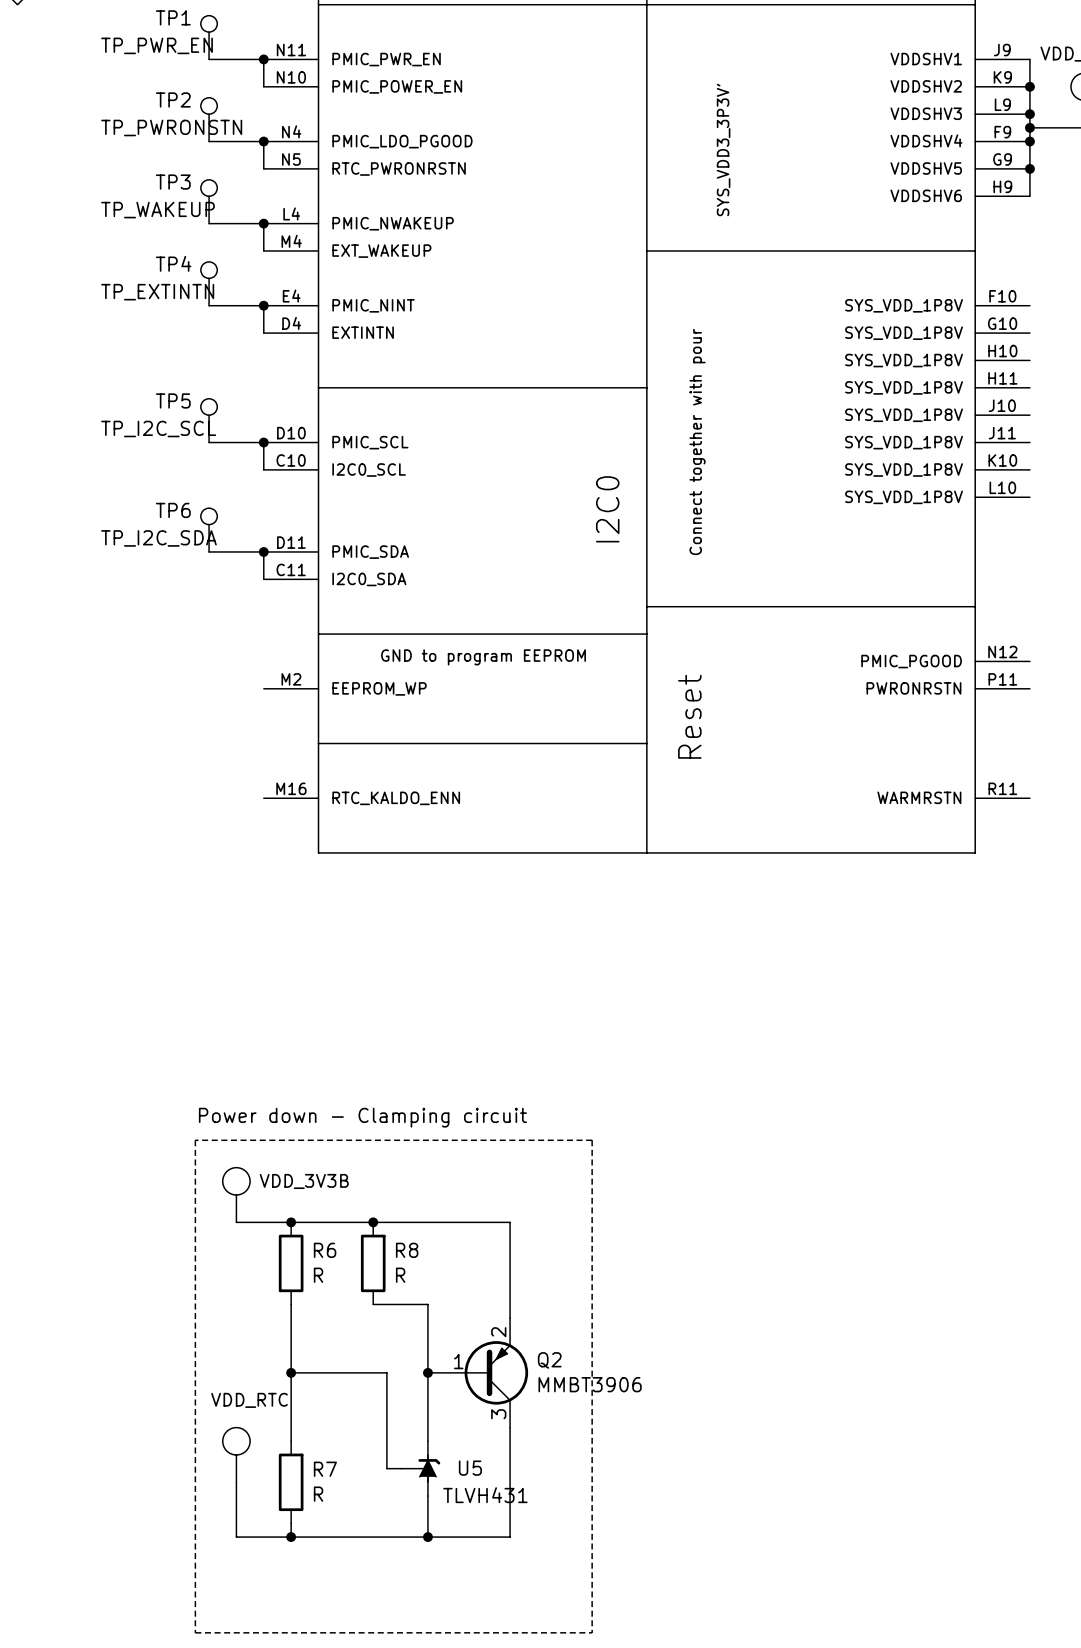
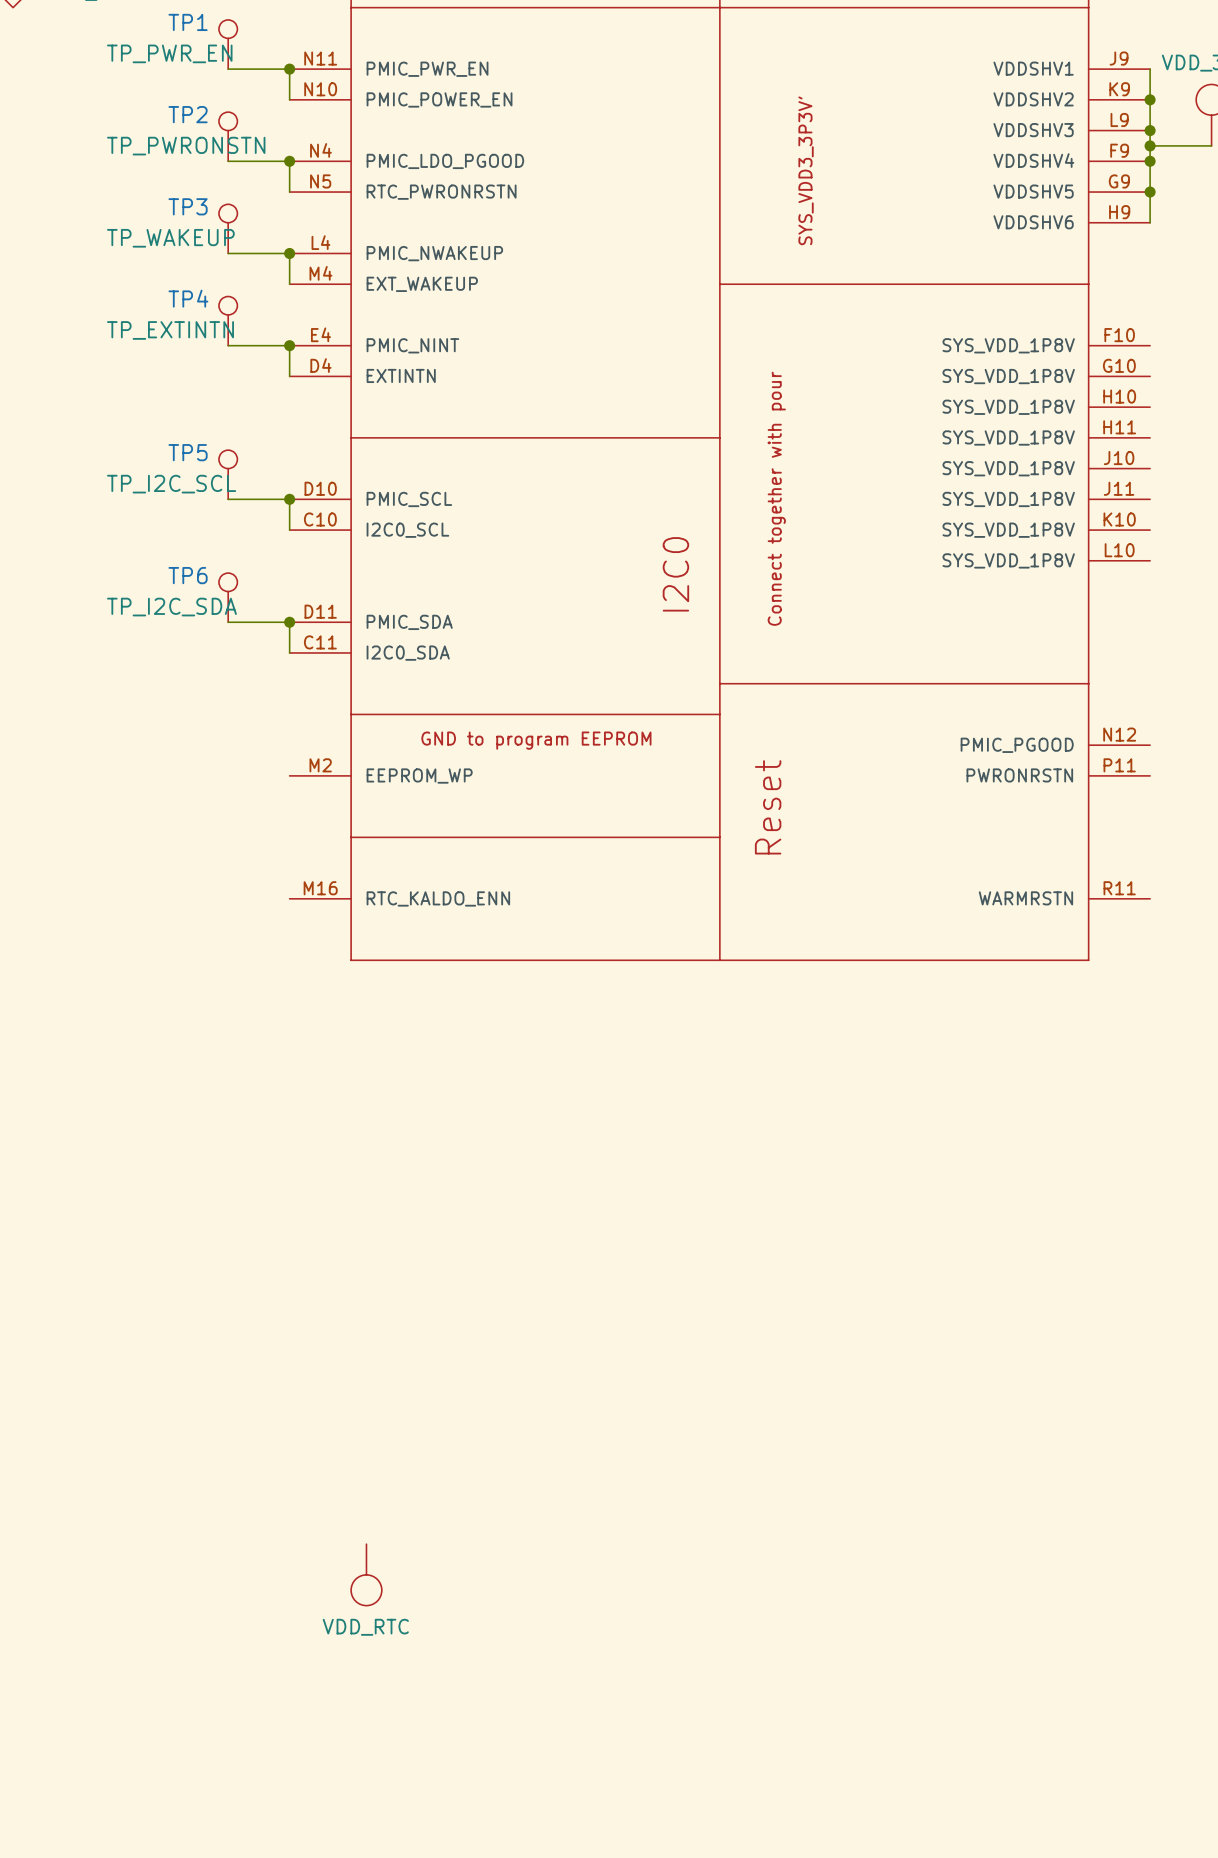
text: Power down - Clamping circuit (362, 1117) -> none
line: (195, 1140) (592, 1140) (592, 1632) (195, 1632) (195, 1140) -> none
power symbol: VDD_3V3B (236, 1195) -> none
wire: (236, 1222) (510, 1222) (510, 1318) -> none
junction: (291, 1222) -> none
junction: (373, 1222) -> none
R6: R (291, 1263) -> none
R8: R (373, 1263) -> none
wire: (291, 1304) (291, 1441) -> none
wire: (373, 1304) (427, 1304) (427, 1441) -> none
wire: (291, 1372) (386, 1372) (386, 1468) (400, 1468) -> none
junction: (291, 1372) -> none
junction: (427, 1372) -> none
Q2: MMBT3906 (478, 1372) -> none
wire: (510, 1427) (510, 1537) (236, 1537) (236, 1482) -> none
power symbol rotation: 0° (236, 1454) -> 180° (366, 1574)
power symbol position: VDD_RTC (236, 1454) -> VDD_RTC (366, 1574)
U5: TLVH431 (420, 1468) -> none
R7: R (291, 1482) -> none
wire: (427, 1496) (427, 1537) -> none
wire: (291, 1523) (291, 1537) -> none
junction: (291, 1537) -> none
junction: (427, 1537) -> none

